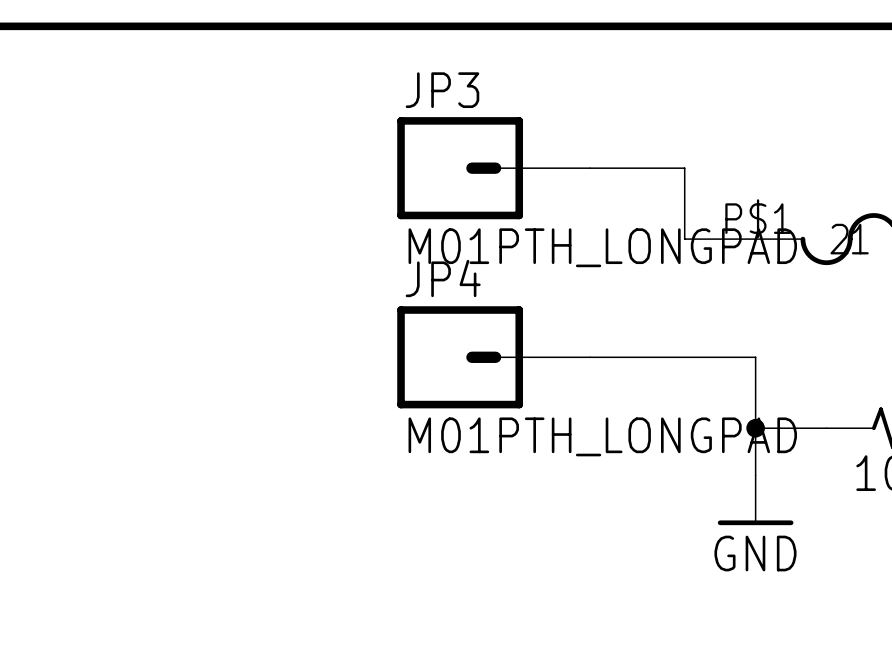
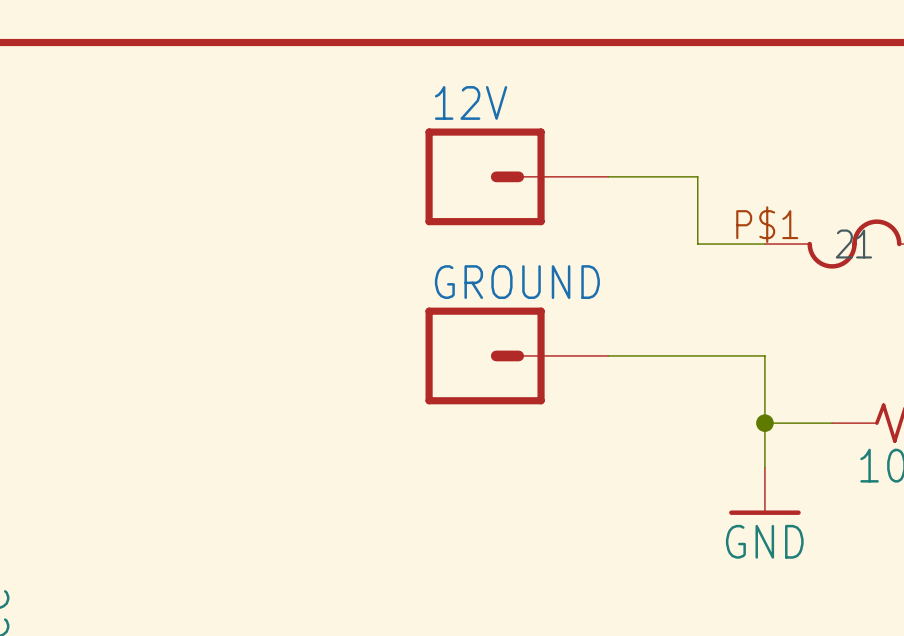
JP3 name: JP3 (442, 90) -> 12V (471, 102)
JP3 value: M01PTH_LONGPAD (602, 247) -> none
JP4 name: JP4 (443, 278) -> GROUND (517, 282)
JP4 value: M01PTH_LONGPAD (602, 436) -> none

